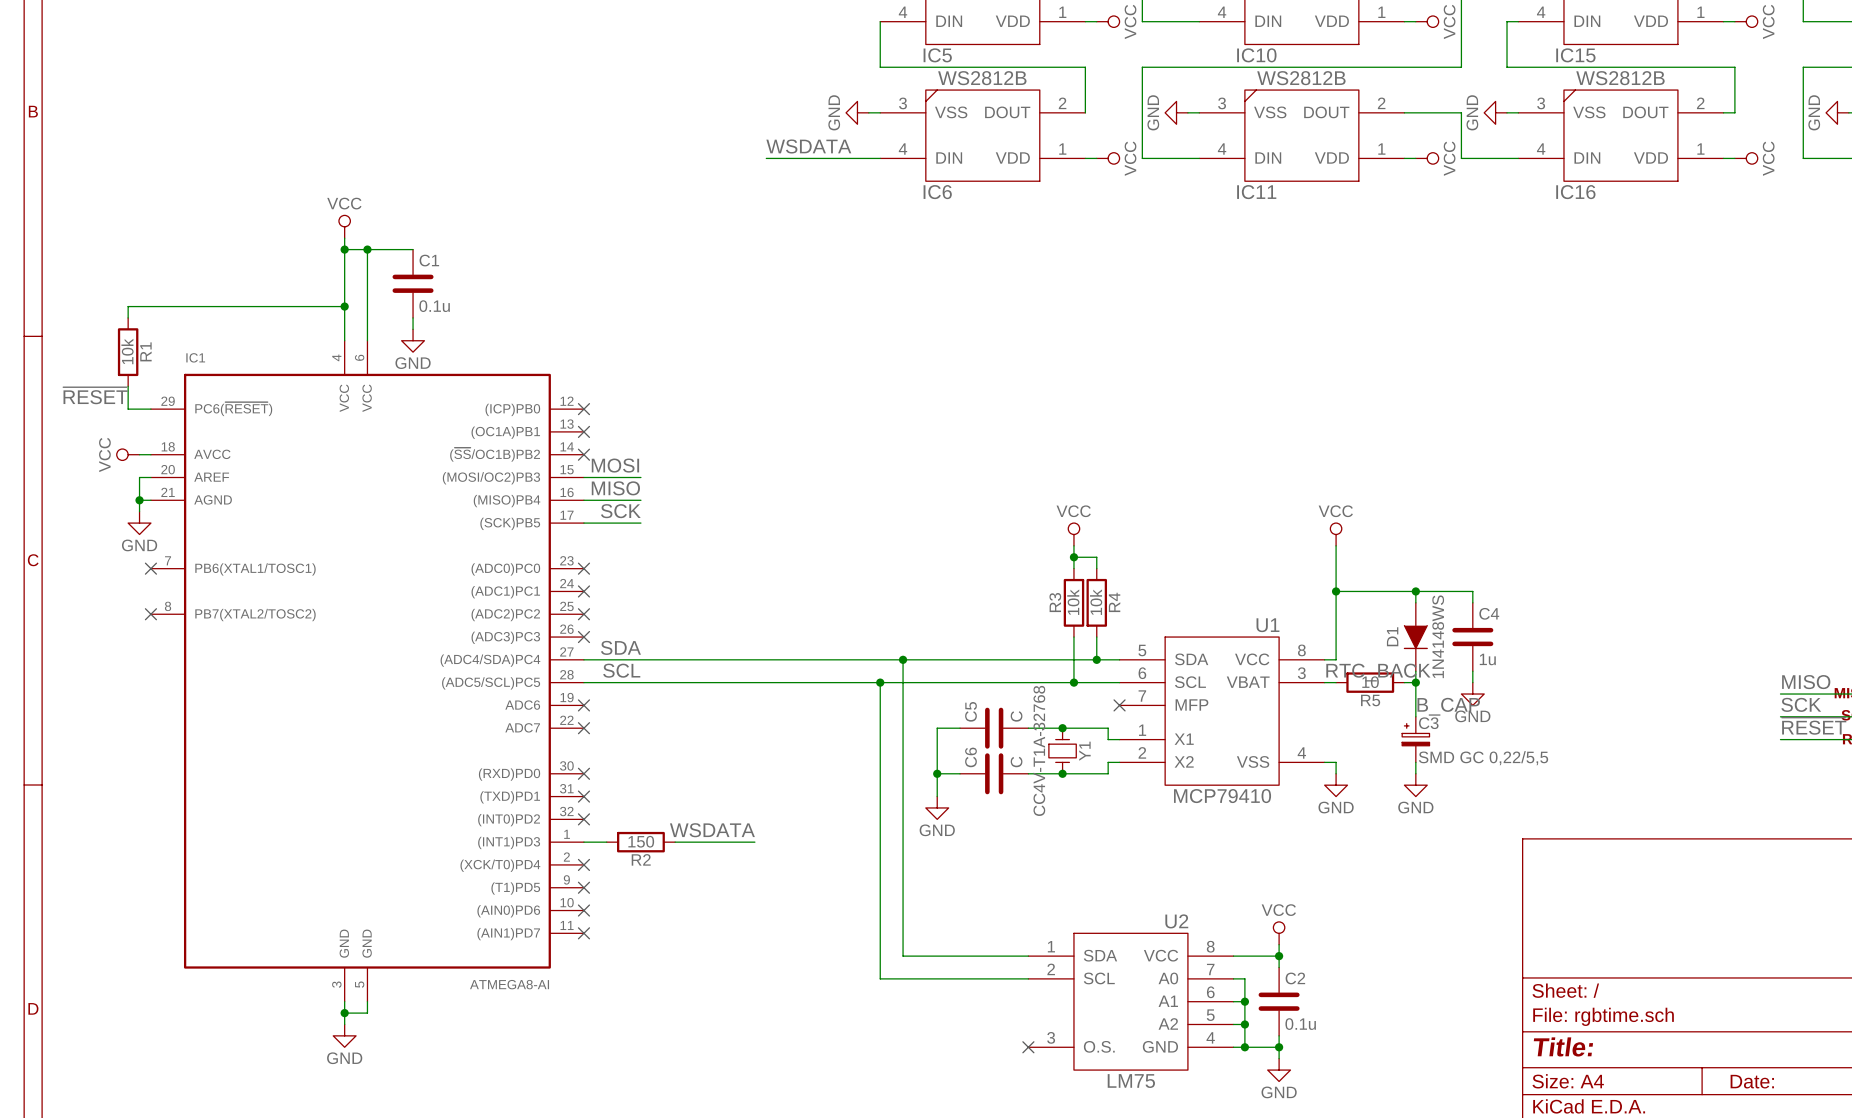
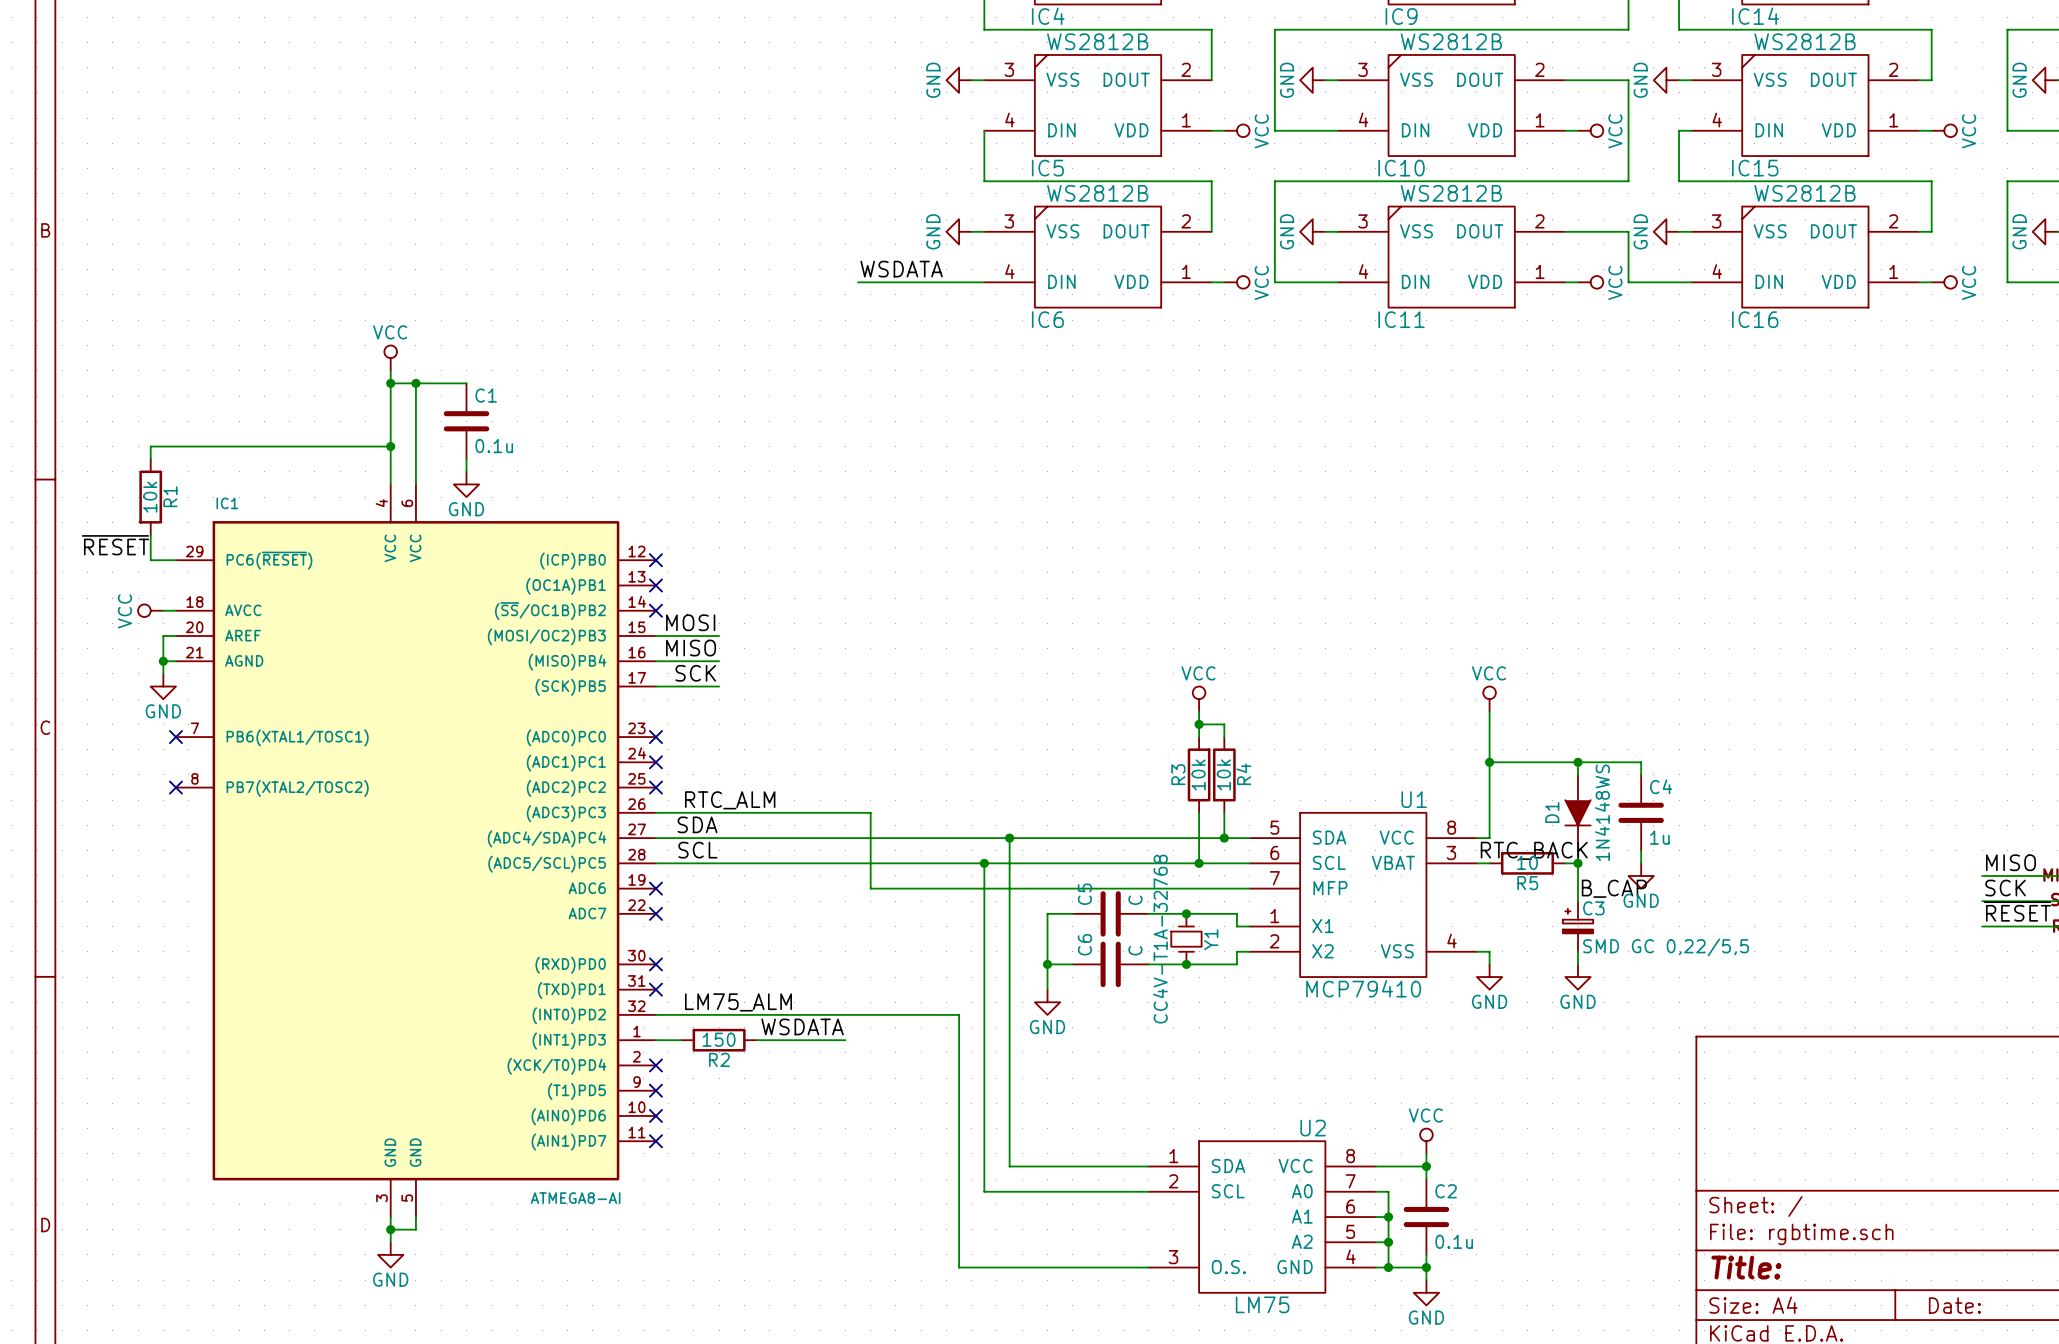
label: none -> RTC_ALM (730, 800)
wire: none -> (655, 812) (870, 812) (870, 888) (1249, 888)
no-connect mark: (583, 637) -> none
no-connect mark: (1119, 705) -> none
label: none -> LM75_ALM (738, 1002)
wire: none -> (655, 1014) (959, 1014) (959, 1267) (1148, 1267)
no-connect mark: (583, 819) -> none
no-connect mark: (1028, 1047) -> none

